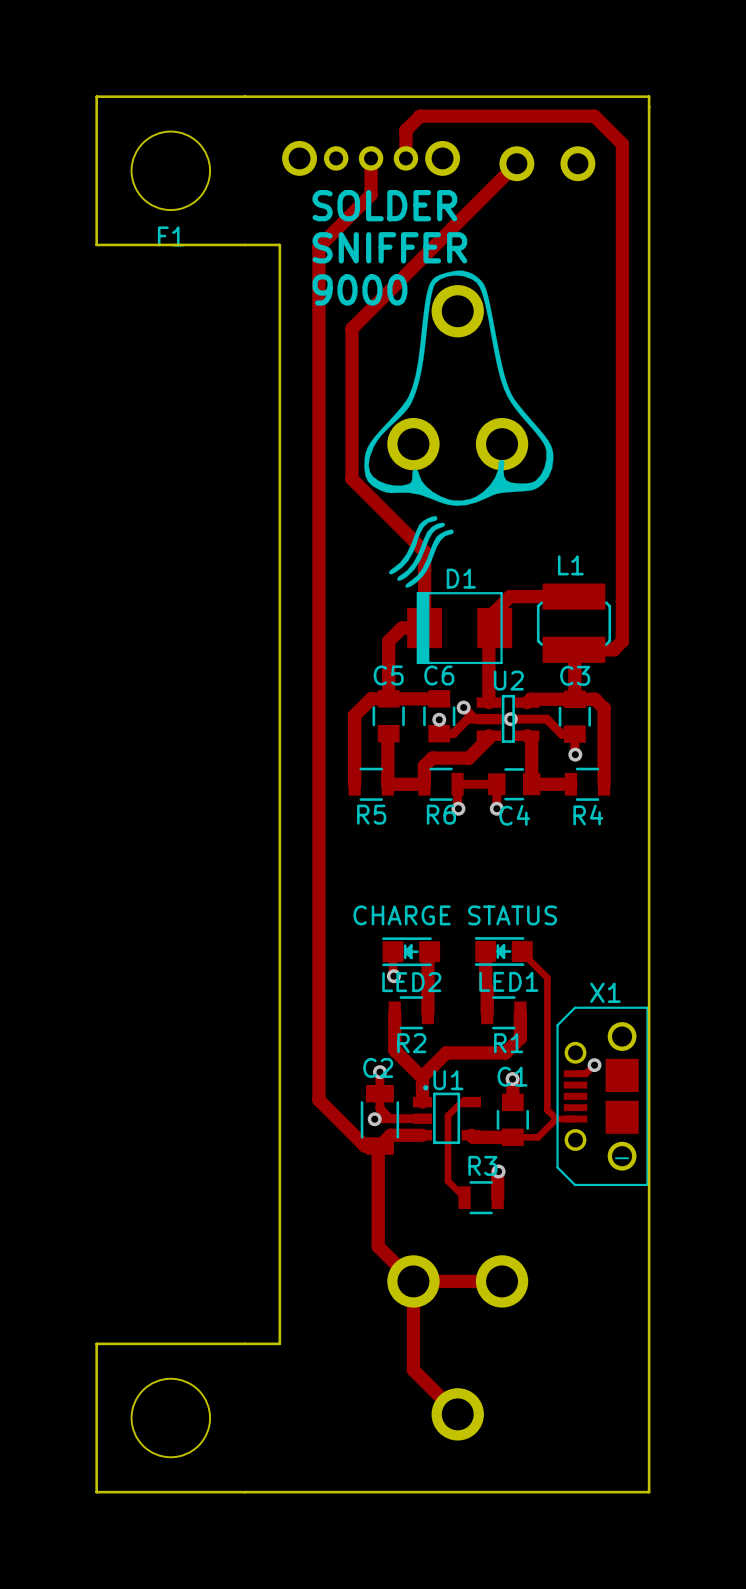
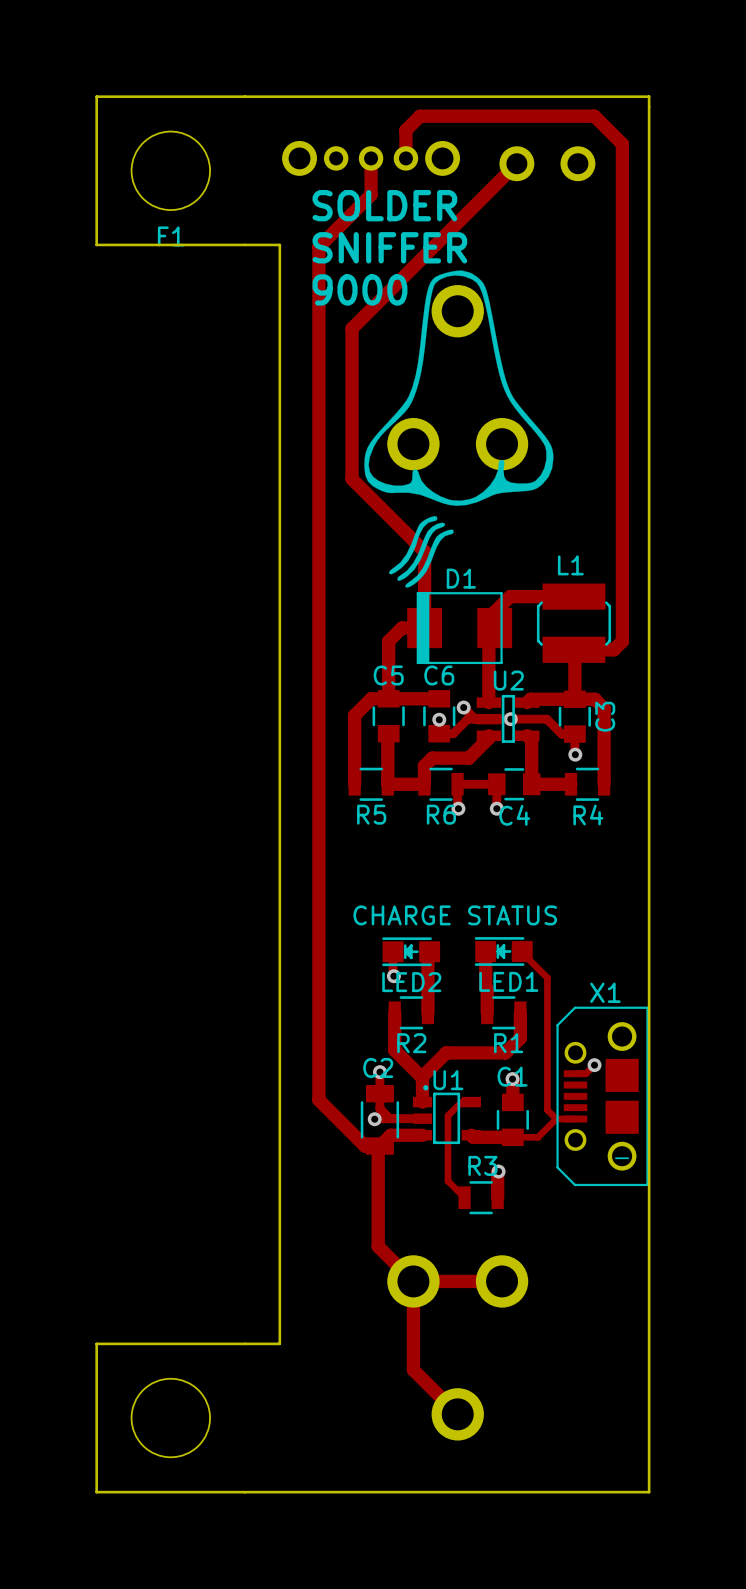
C3 name rotation: 0° (575, 675) -> 90° counterclockwise (605, 716)
C3 name position: C3 (575, 675) -> C3 (605, 716)

